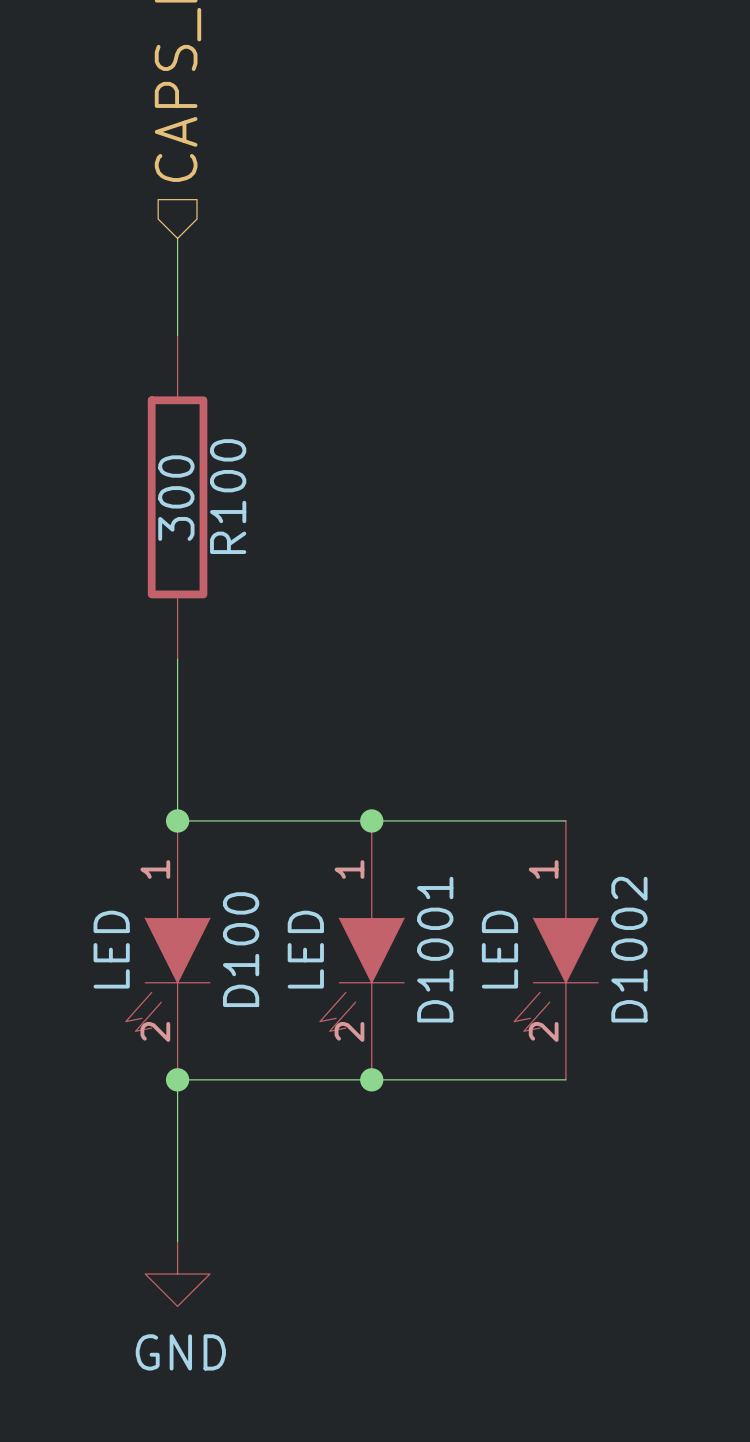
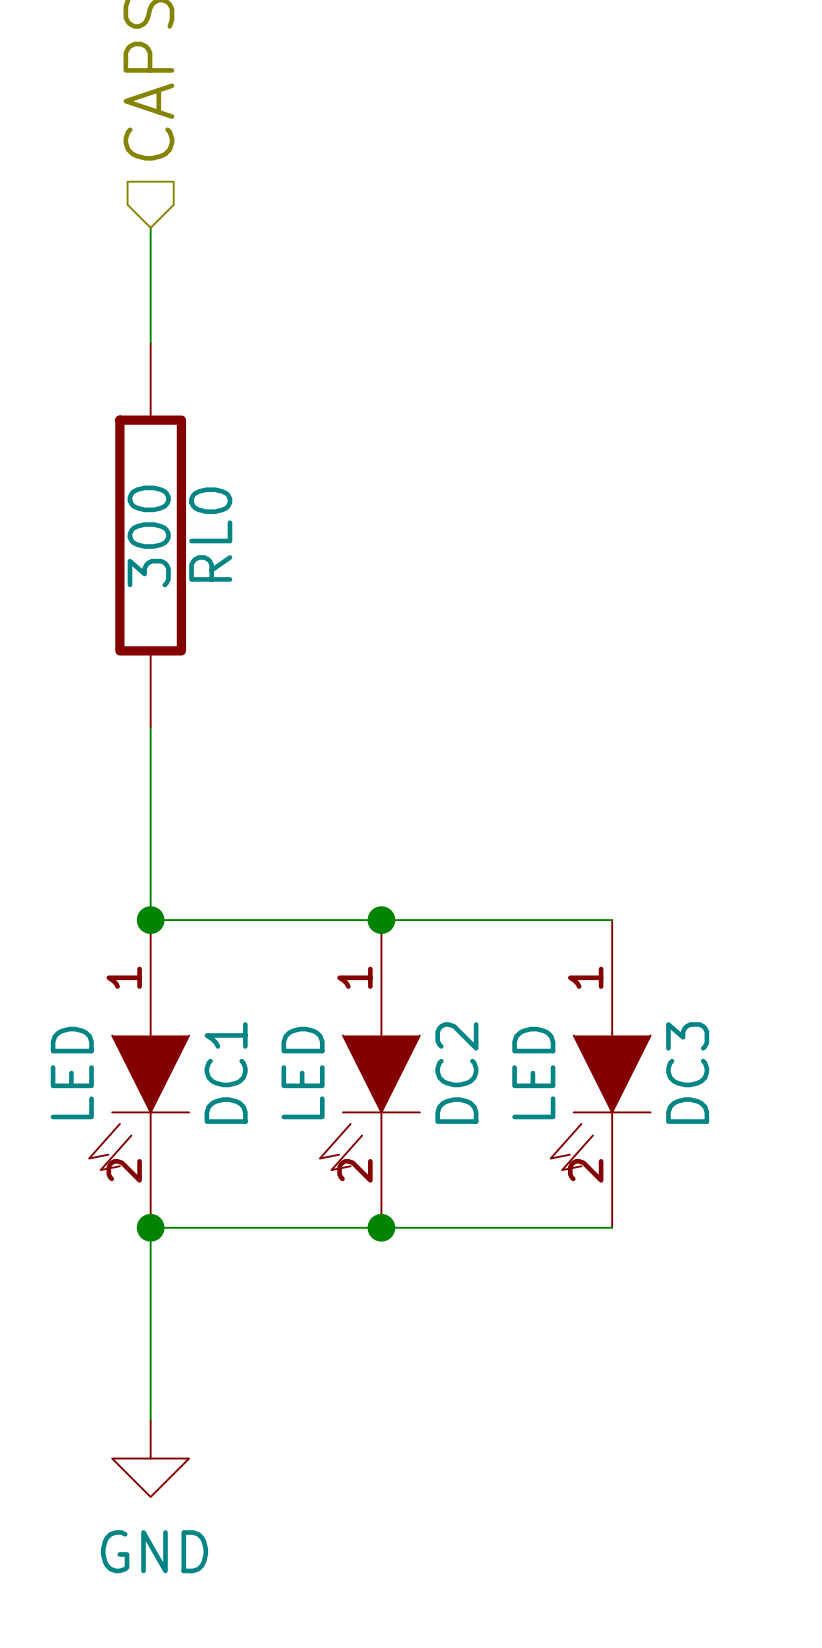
R100 name: R100 (228, 496) -> RL0 (210, 534)
D100 name: D100 (241, 949) -> DC1 (226, 1073)
D1001 name: D1001 (435, 949) -> DC2 (456, 1073)
D1002 name: D1002 (629, 949) -> DC3 (687, 1073)

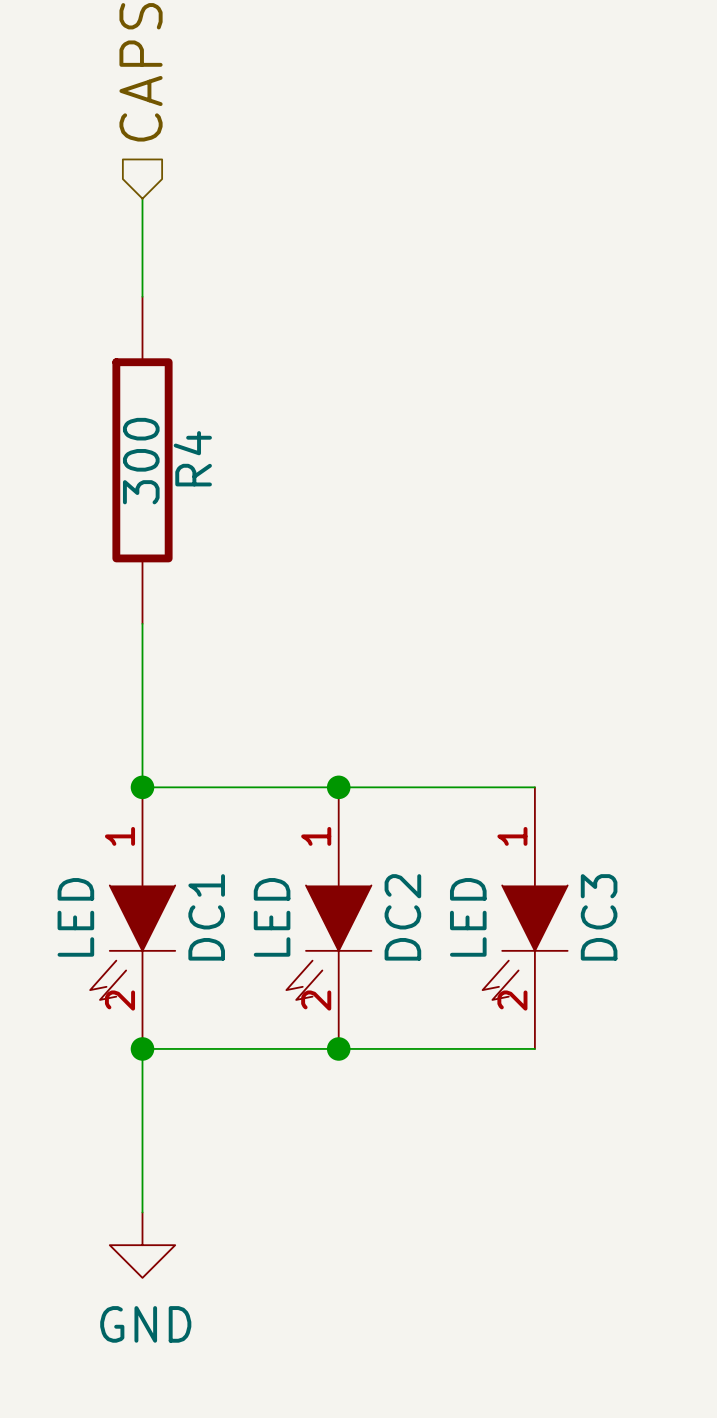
RL0 name: RL0 (210, 534) -> R4 (192, 458)

